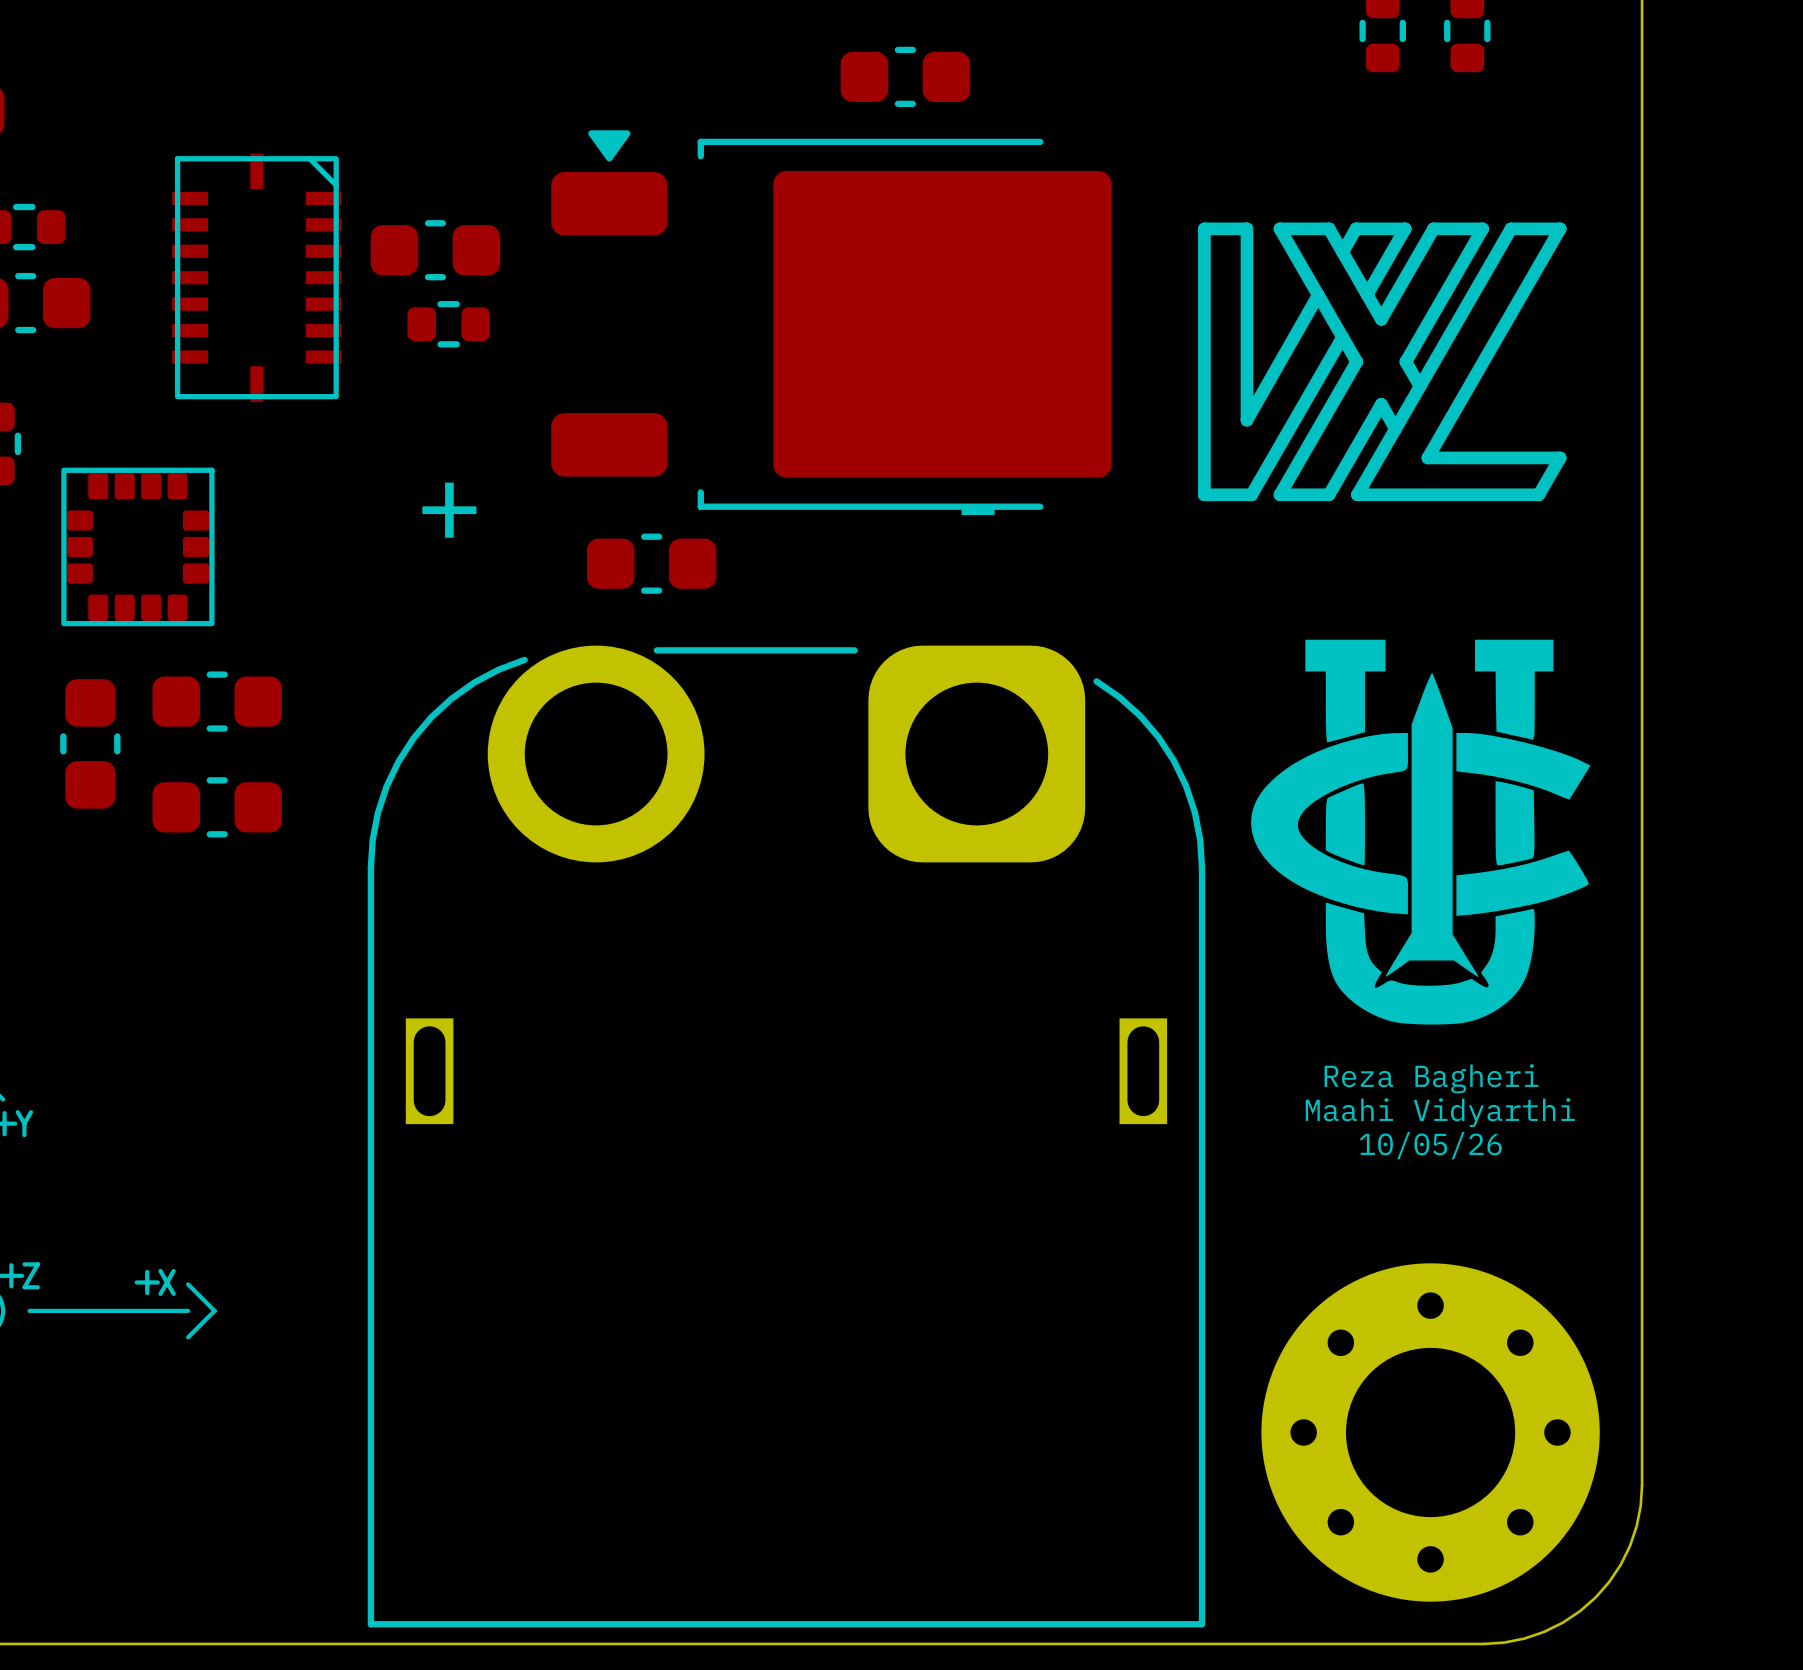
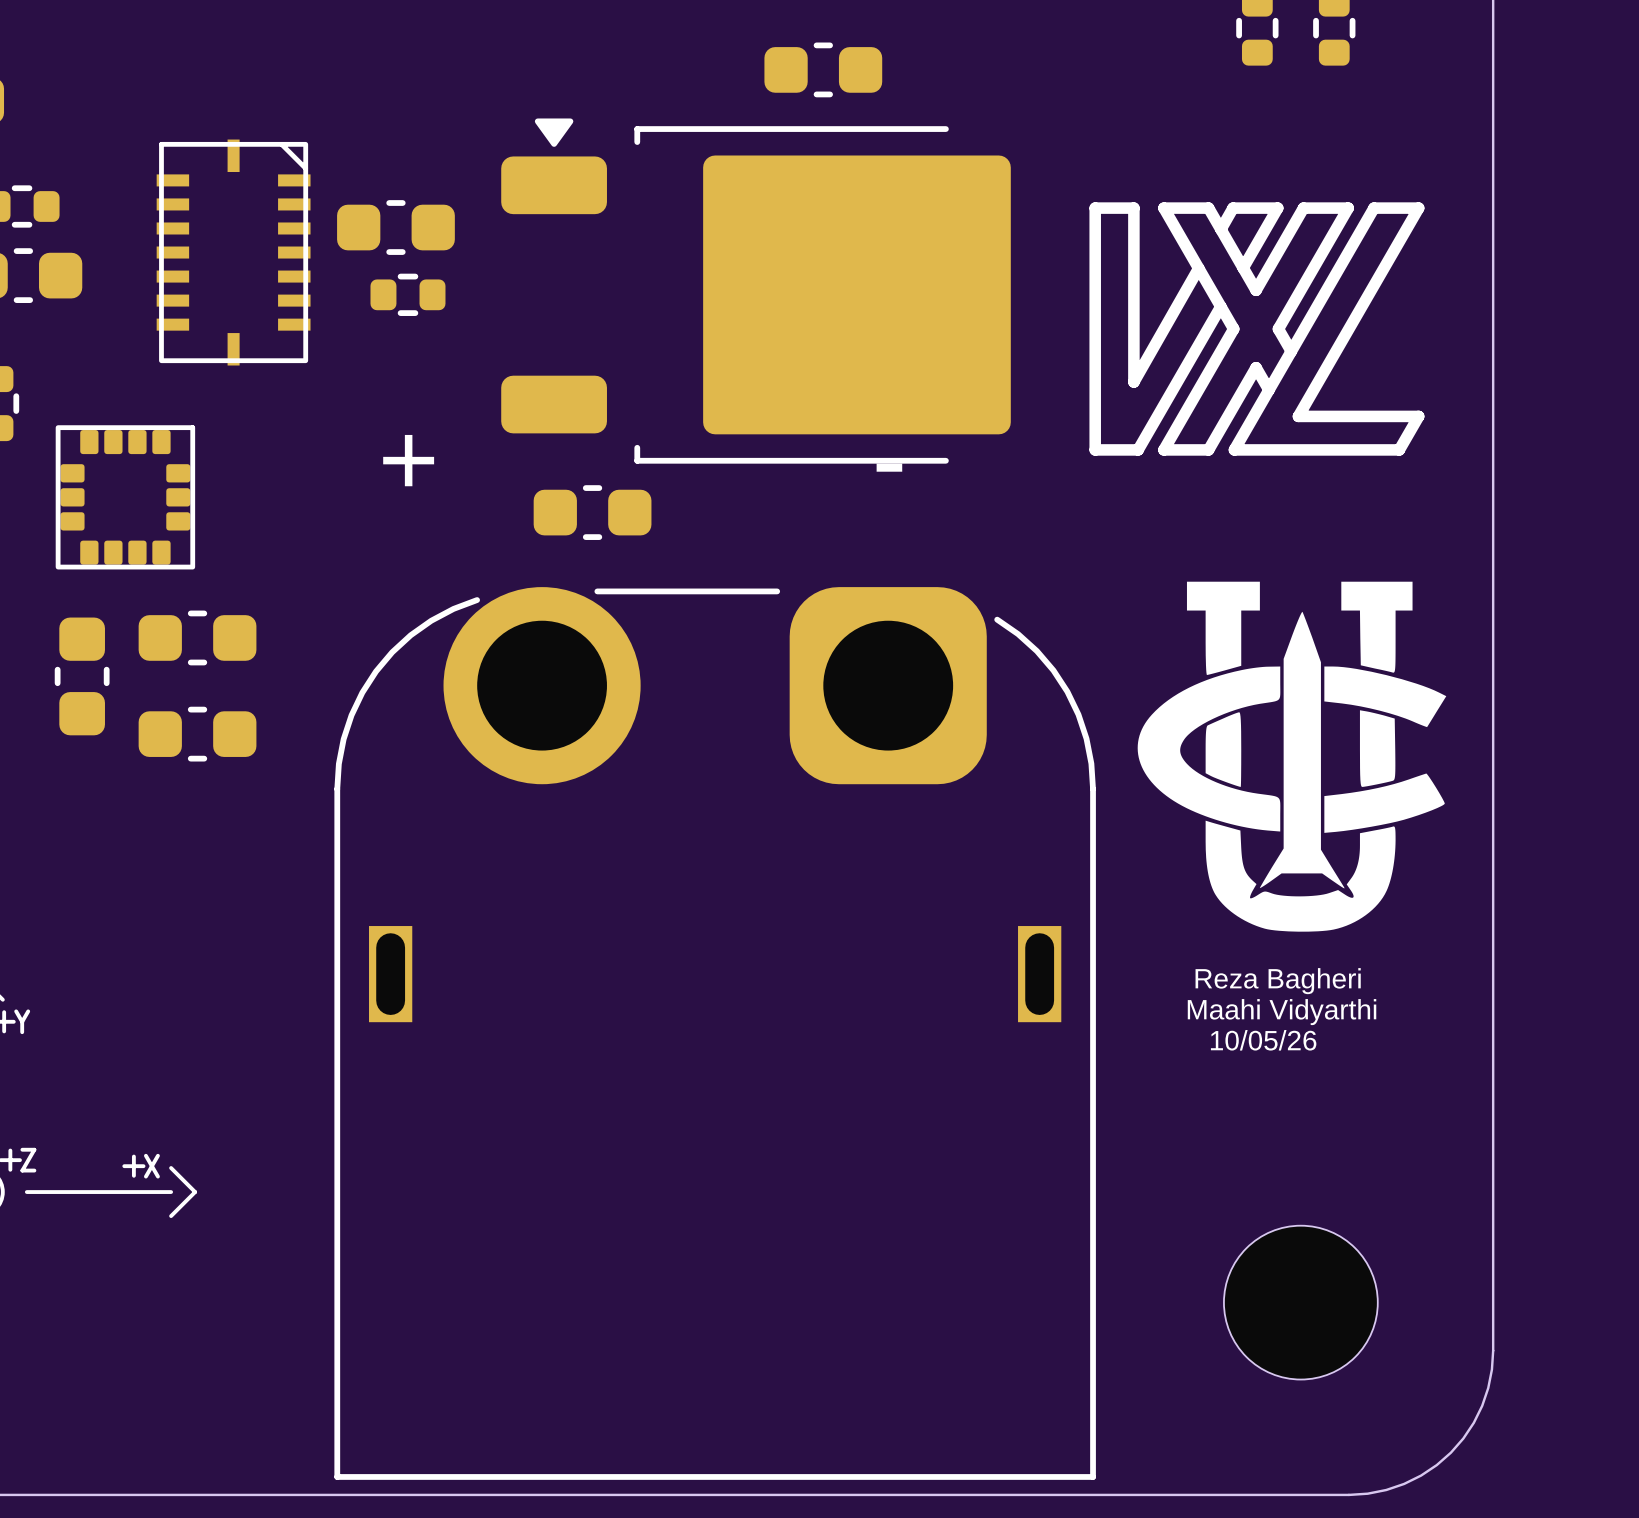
part footprint: [1261, 1263, 1600, 1602] -> [1223, 1225, 1378, 1380]

